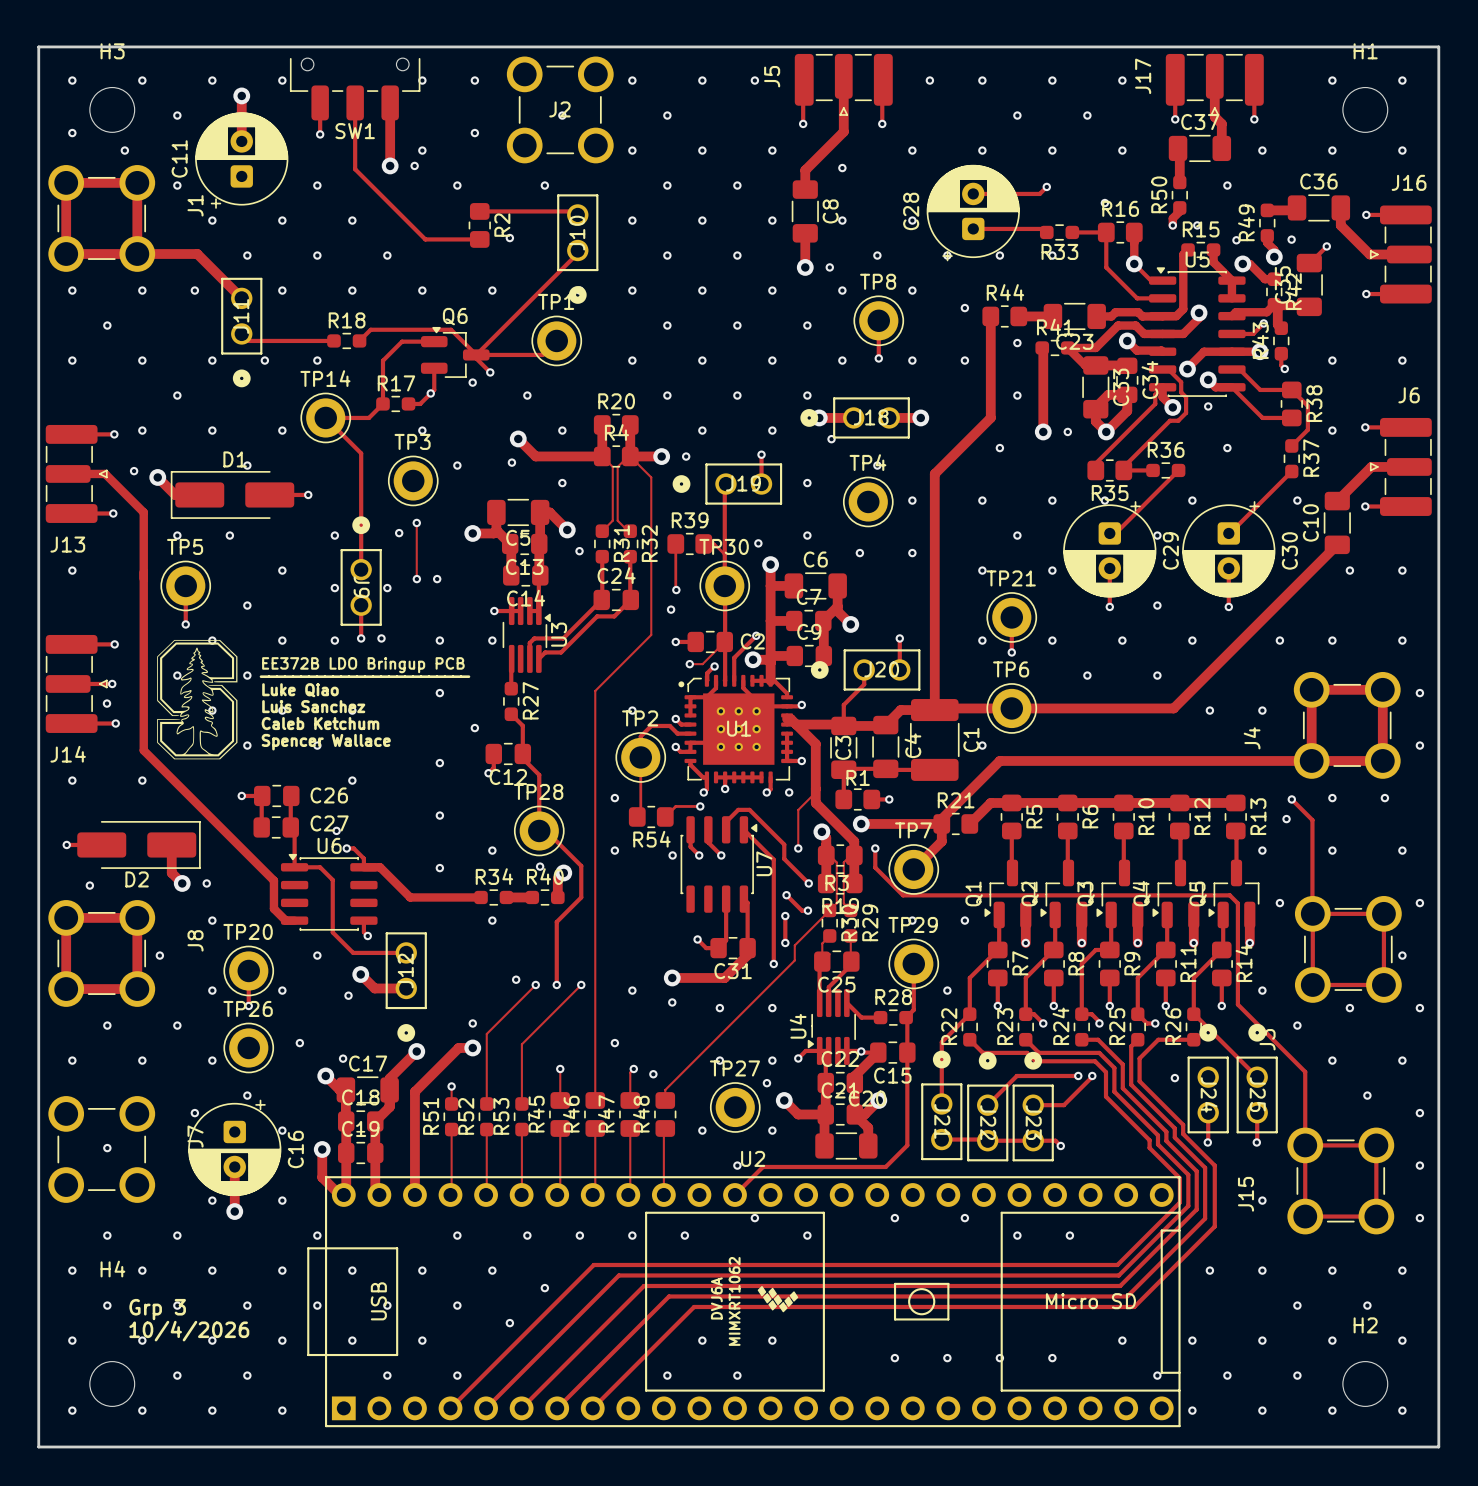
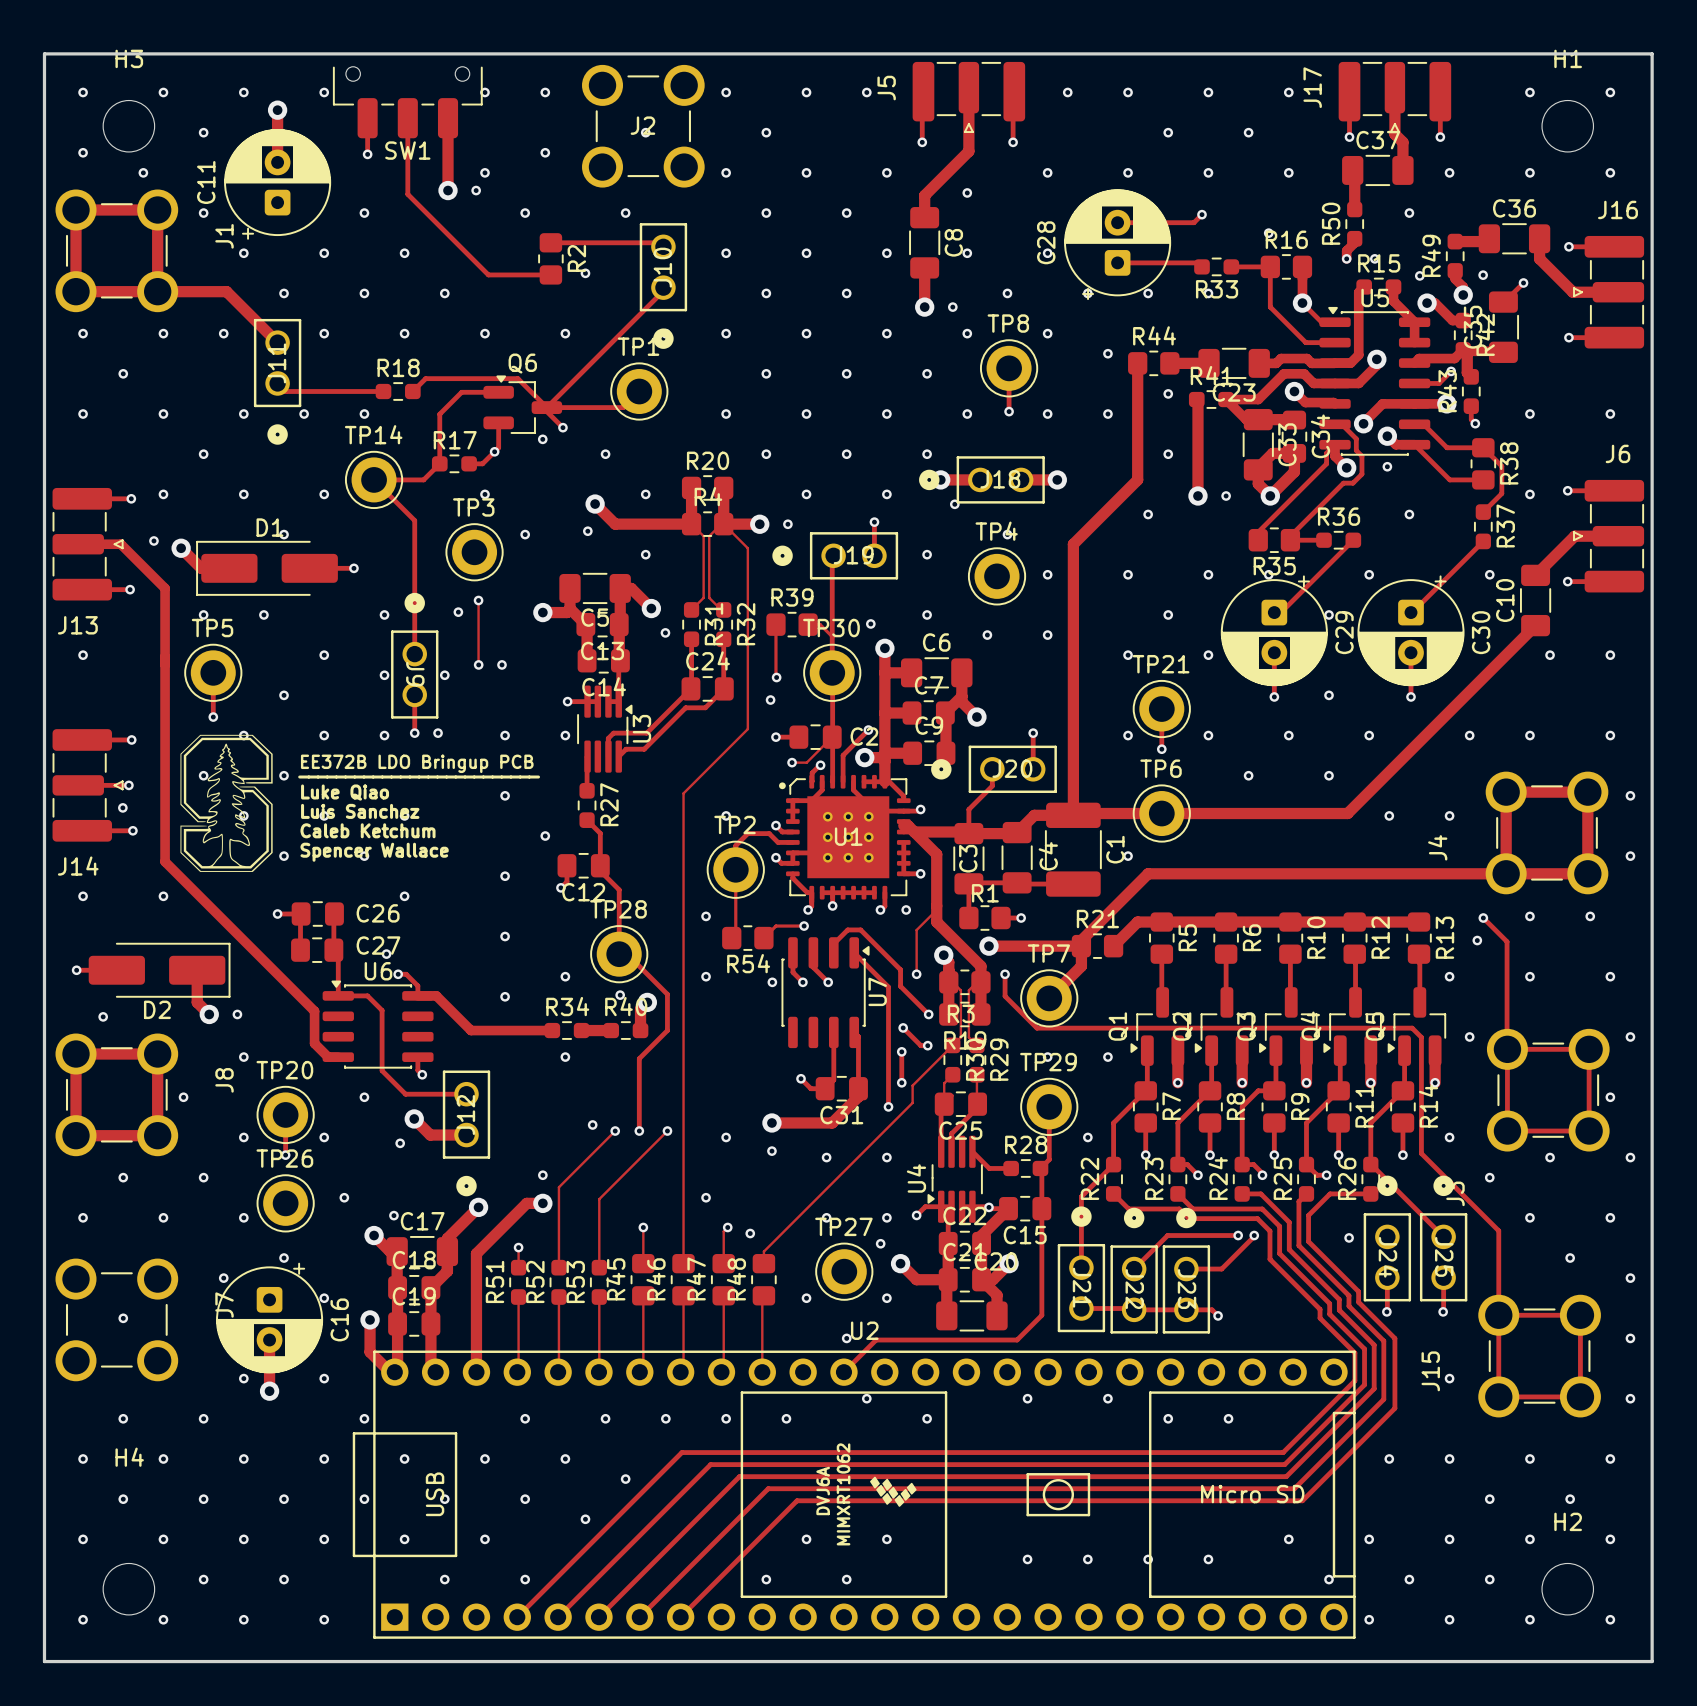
text: Grp 3 (157, 1309) -> none
text: 10/4/2026 (189, 1331) -> none

